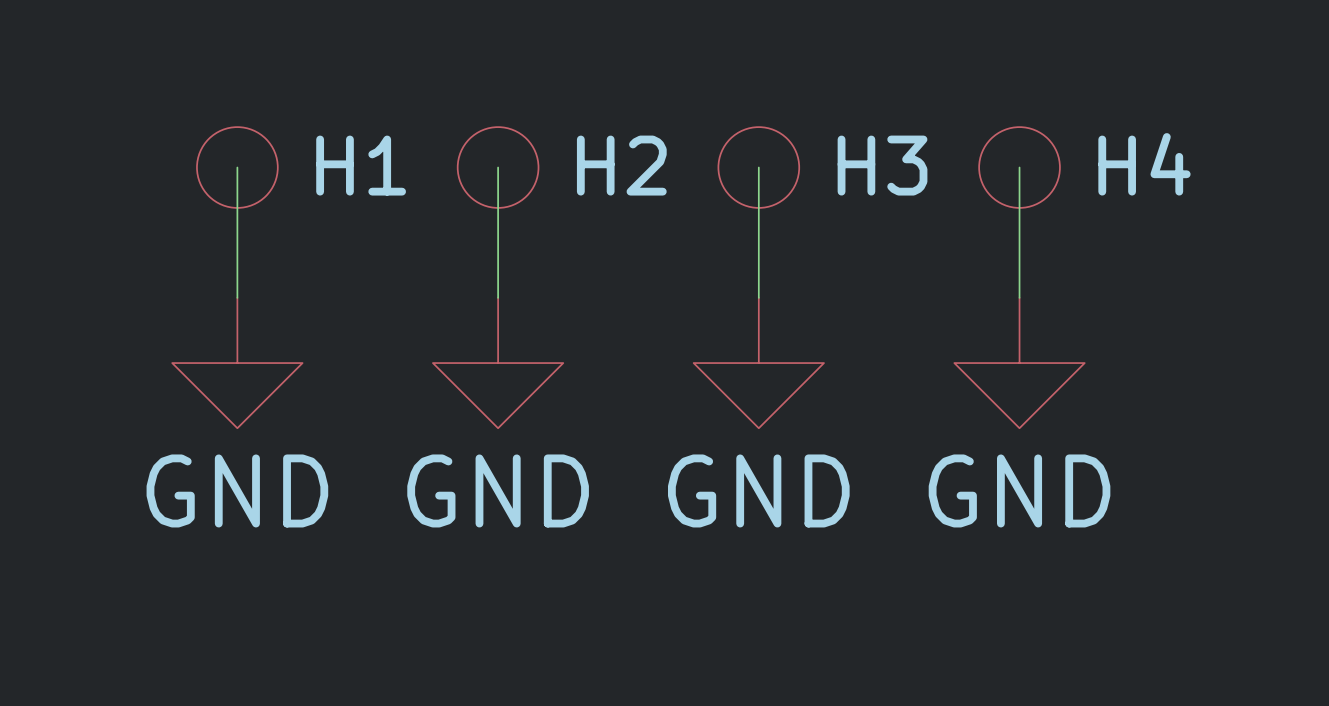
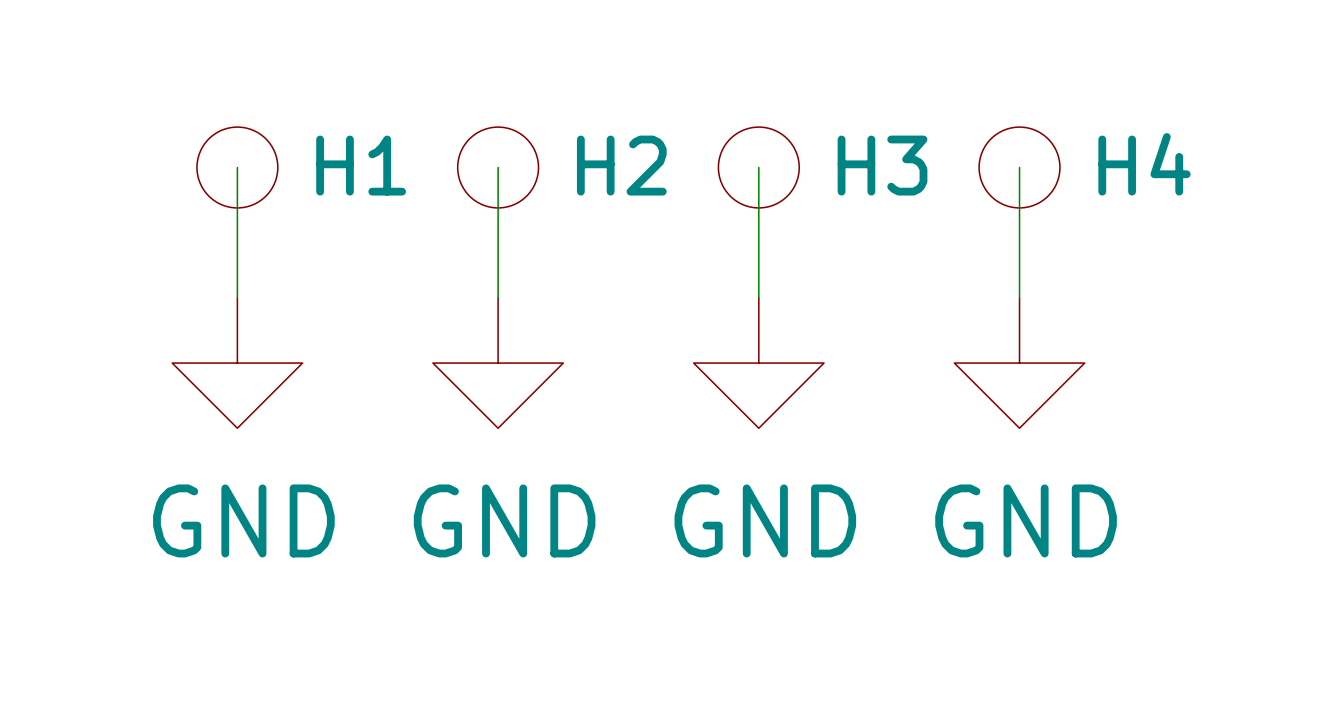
power symbol text position: GND (237, 490) -> GND (243, 520)
power symbol text position: GND (498, 490) -> GND (504, 520)
power symbol text position: GND (758, 490) -> GND (765, 520)
power symbol text position: GND (1019, 490) -> GND (1026, 520)

